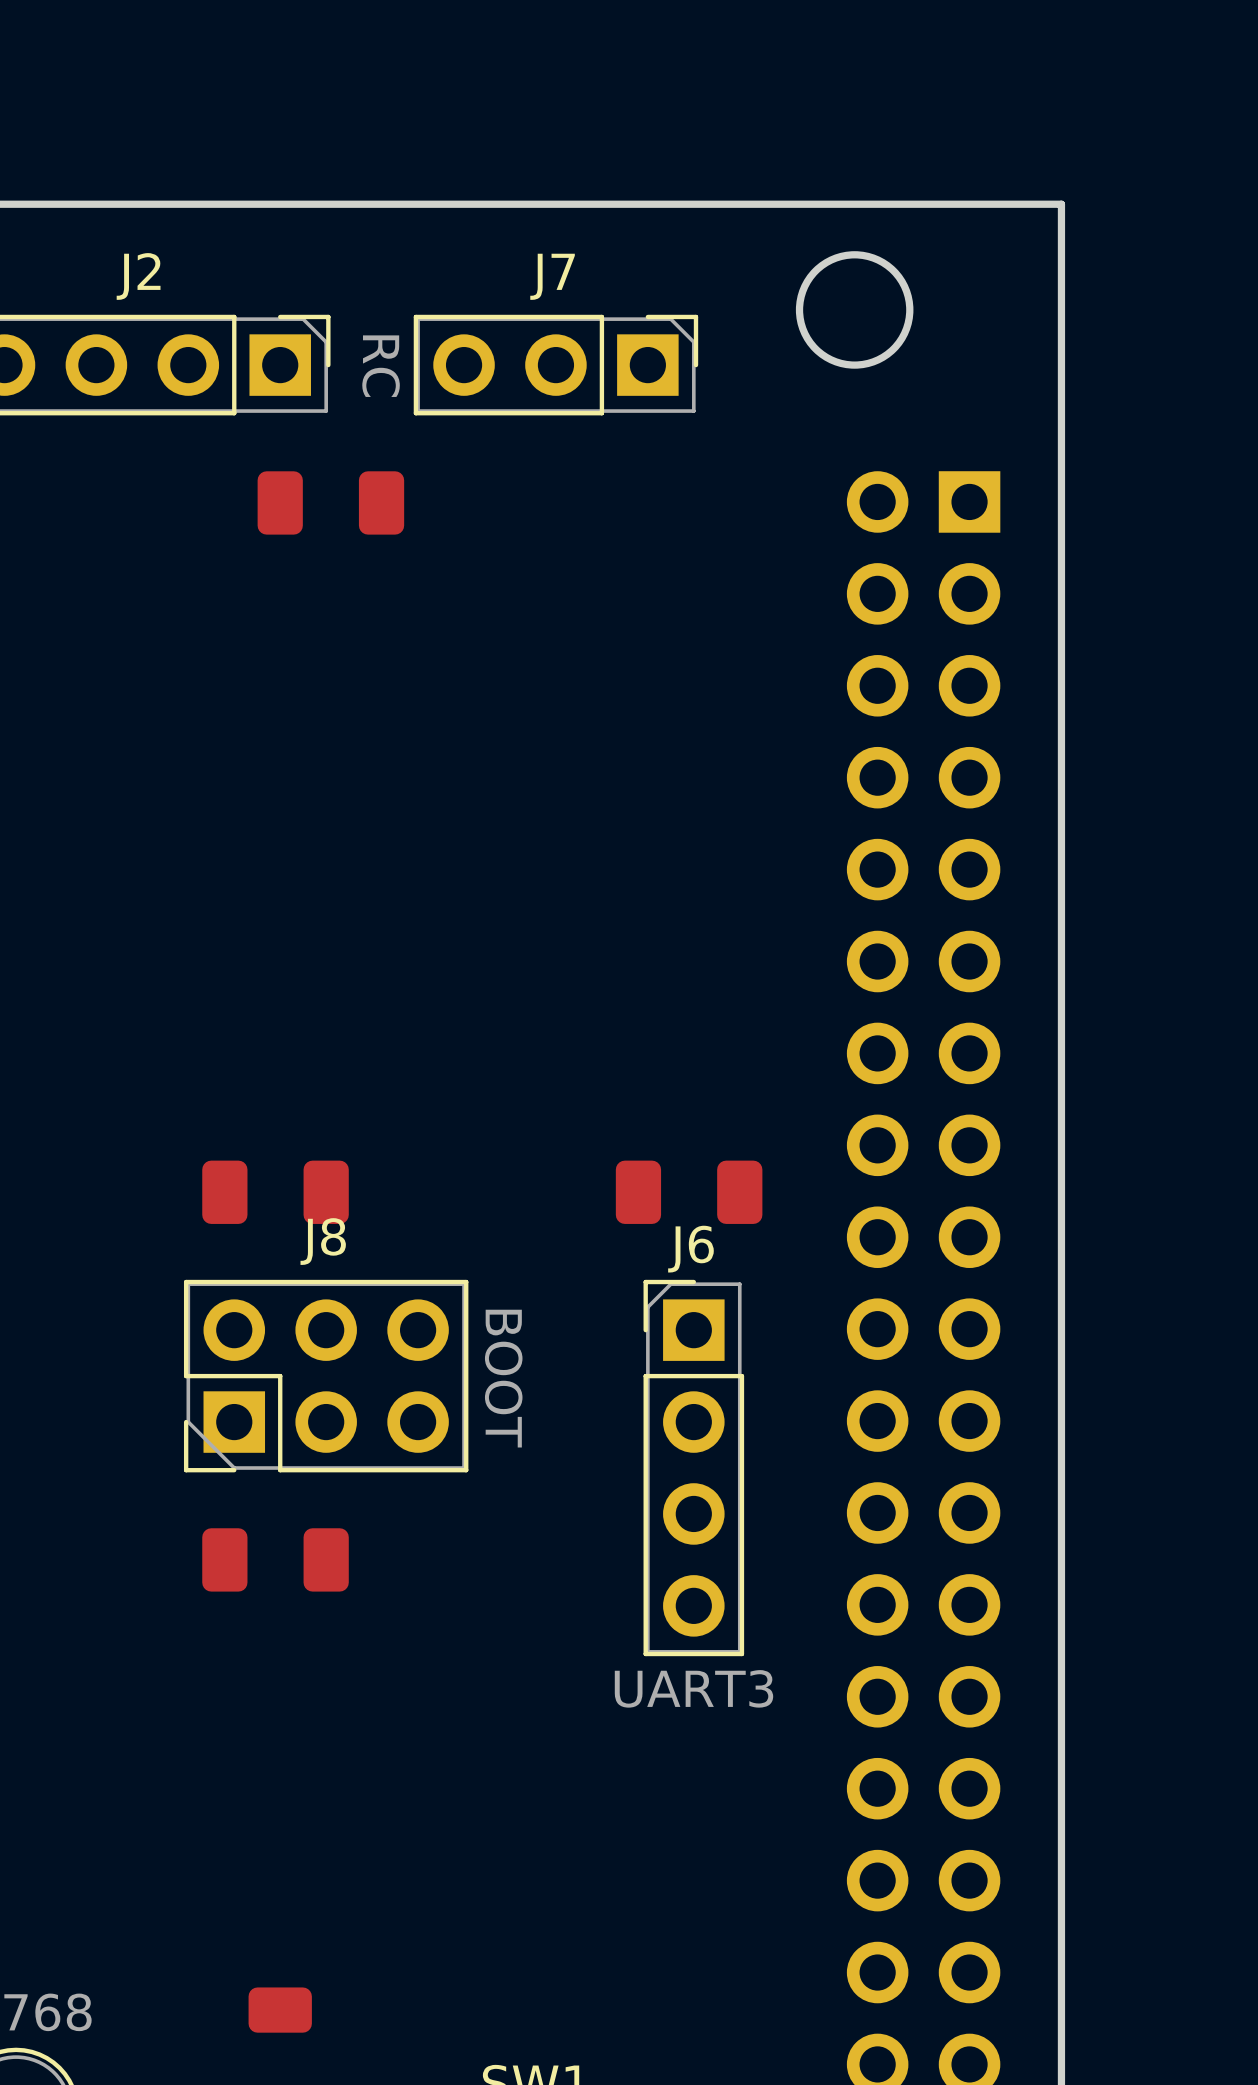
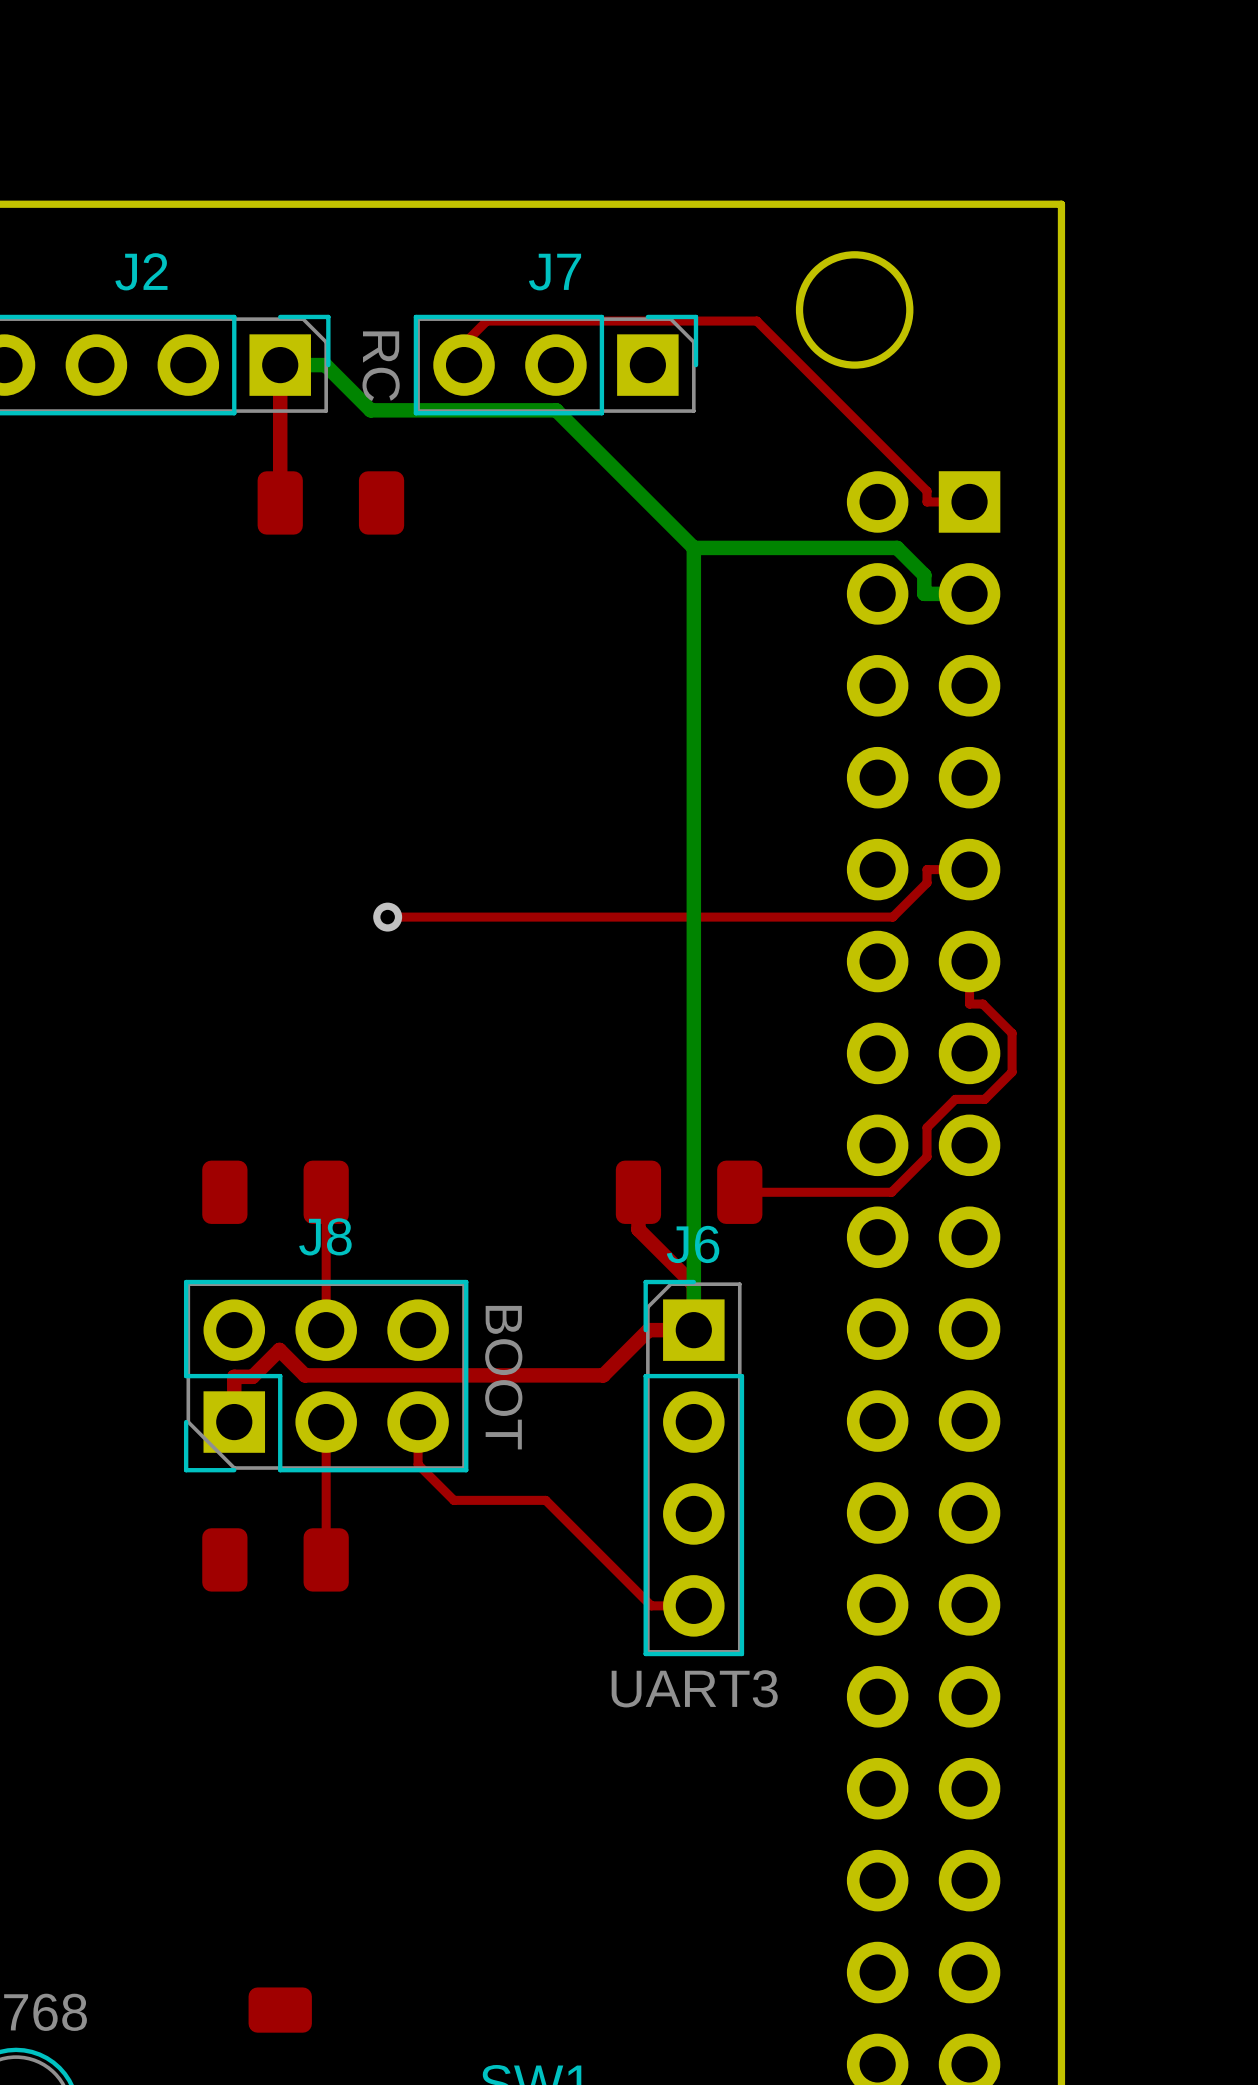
top track: none -> (280, 365) (280, 502)
bottom track: none -> (280, 365) (325, 365) (370, 410) (556, 410) (693, 547)
top track: none -> (442, 365) (486, 321) (756, 321) (927, 491) (927, 501) (969, 501)
bottom track: none -> (693, 547) (897, 547) (924, 575) (924, 593) (969, 593)
bottom track: none -> (693, 547) (693, 1330)
top track: none -> (969, 869) (927, 869) (927, 882) (892, 917) (387, 917)
via: none -> (387, 917)
top track: none -> (969, 961) (969, 1004) (982, 1004) (1012, 1033) (1012, 1072) (984, 1099) (955, 1099) (927, 1127) (927, 1156) (891, 1192) (739, 1192)
top track: none -> (326, 1192) (326, 1330)
top track: none -> (638, 1192) (638, 1229) (693, 1284) (693, 1330) (648, 1330) (603, 1375) (304, 1375) (279, 1349) (252, 1376) (234, 1376) (234, 1422)
top track: none -> (326, 1422) (326, 1559)
top track: none -> (418, 1422) (418, 1464) (453, 1500) (545, 1500) (651, 1605) (693, 1605)

